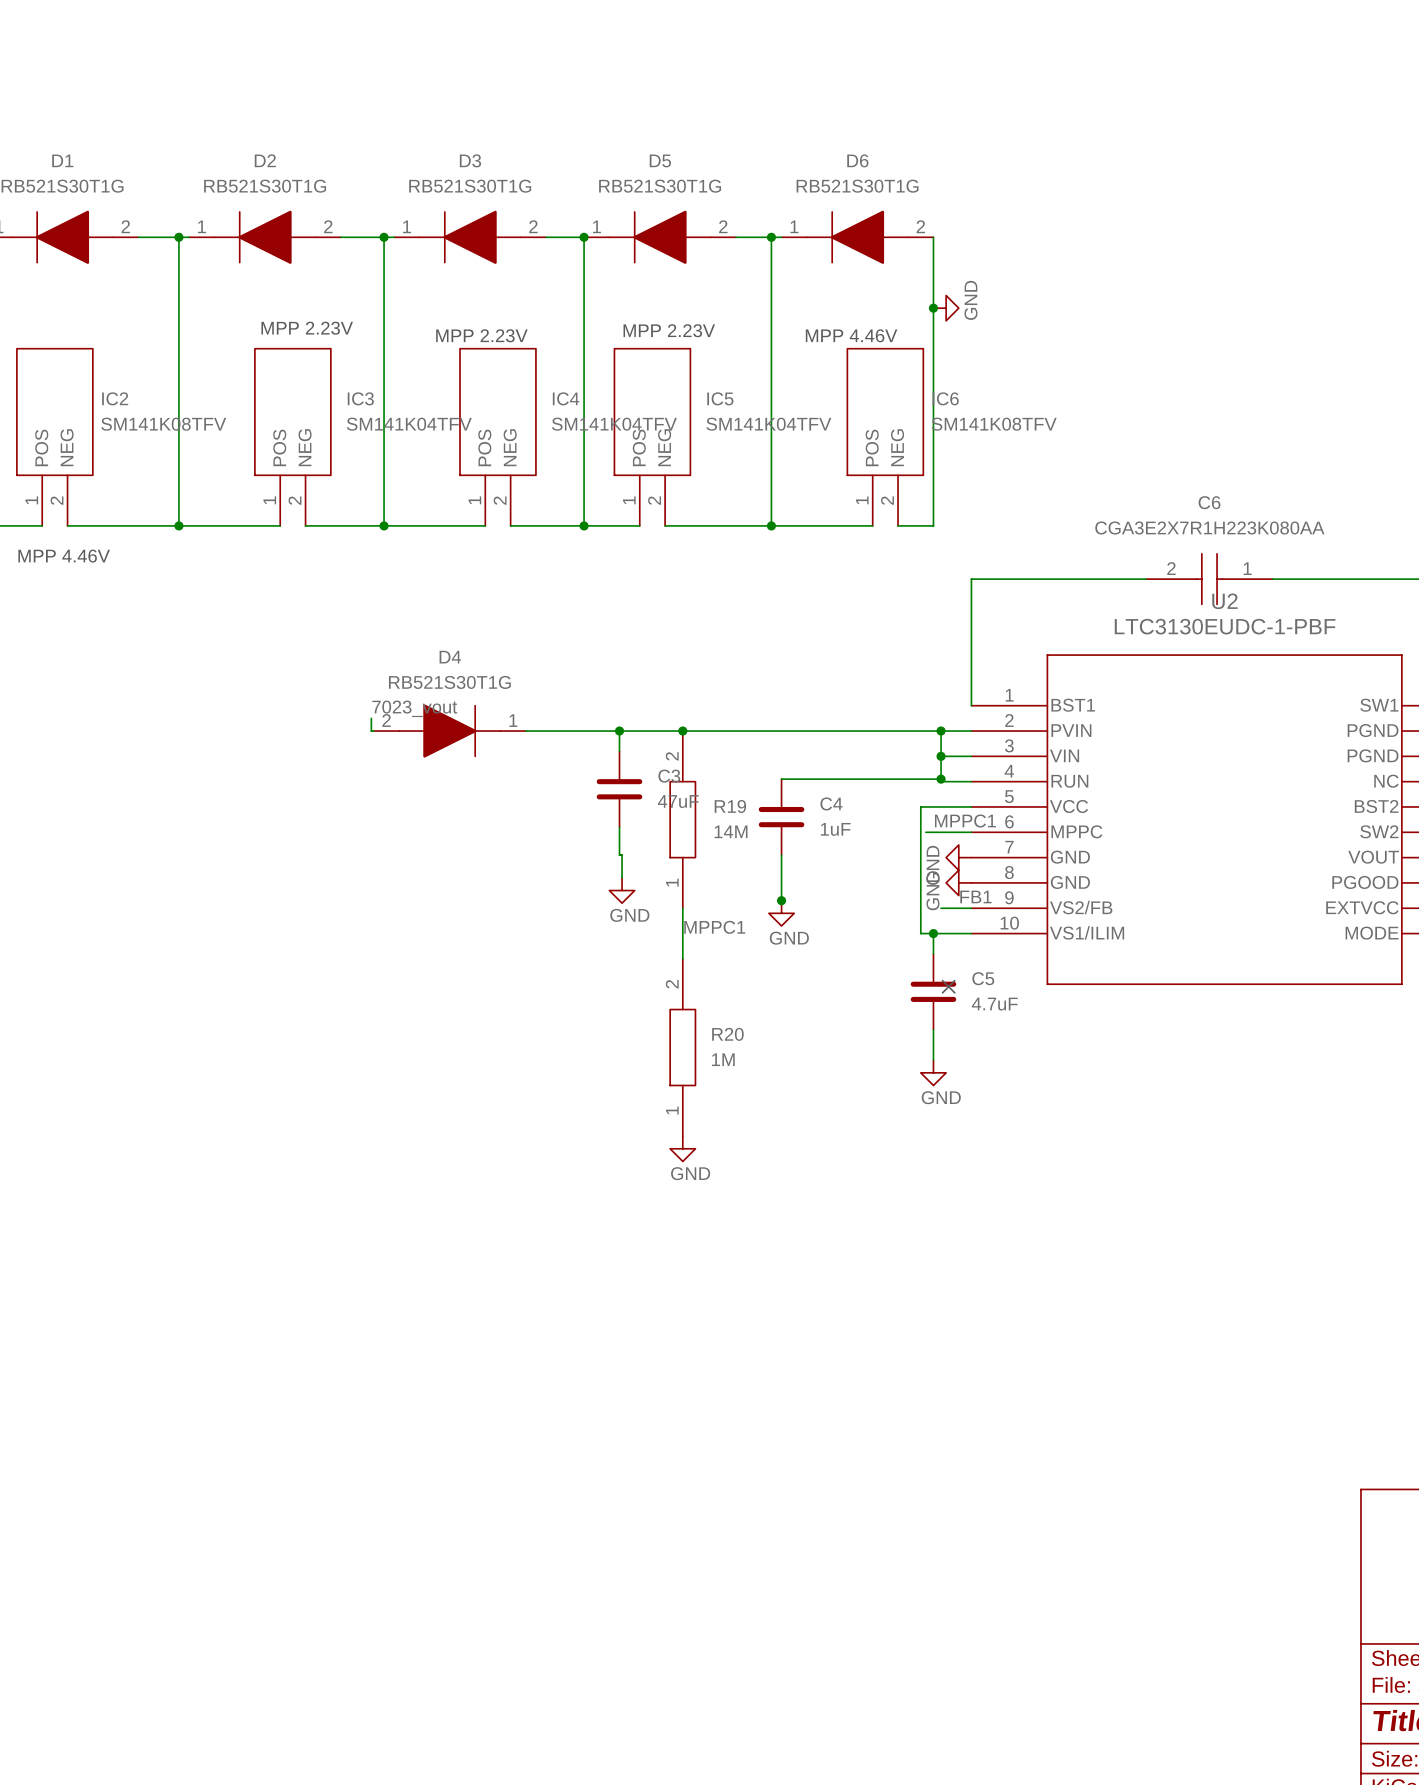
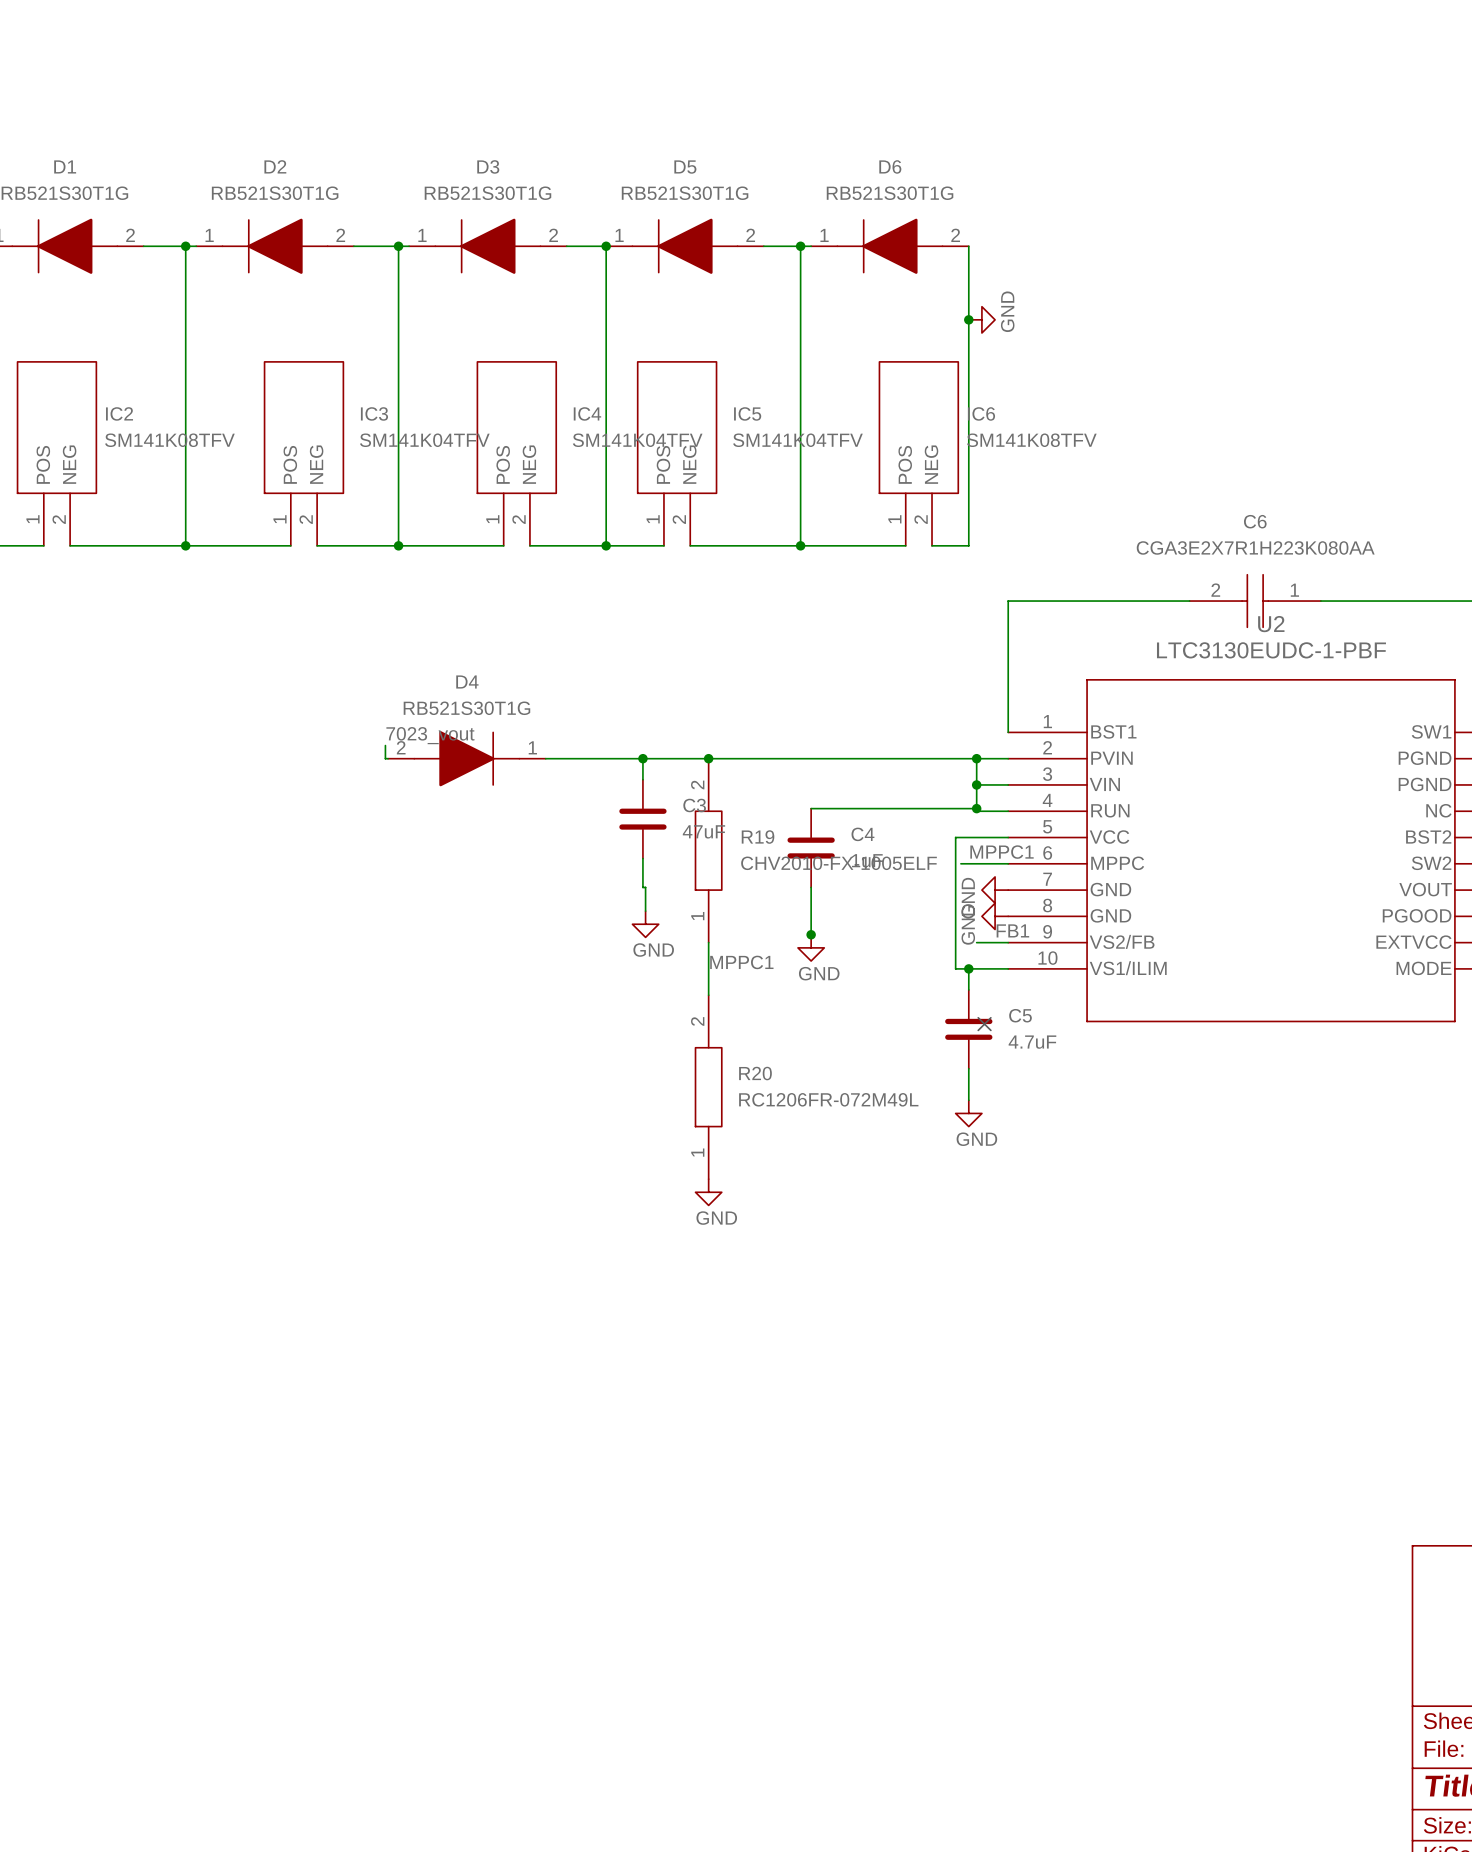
text: MPP 2.23V (307, 328) -> none
text: MPP 2.23V (669, 330) -> none
text: MPP 2.23V (481, 335) -> none
text: MPP 4.46V (851, 335) -> none
text: MPP 4.46V (64, 556) -> none
R19 value: 14M (731, 831) -> CHV2010-FX-1005ELF (839, 863)
R20 value: 1M (723, 1059) -> RC1206FR-072M49L (828, 1099)

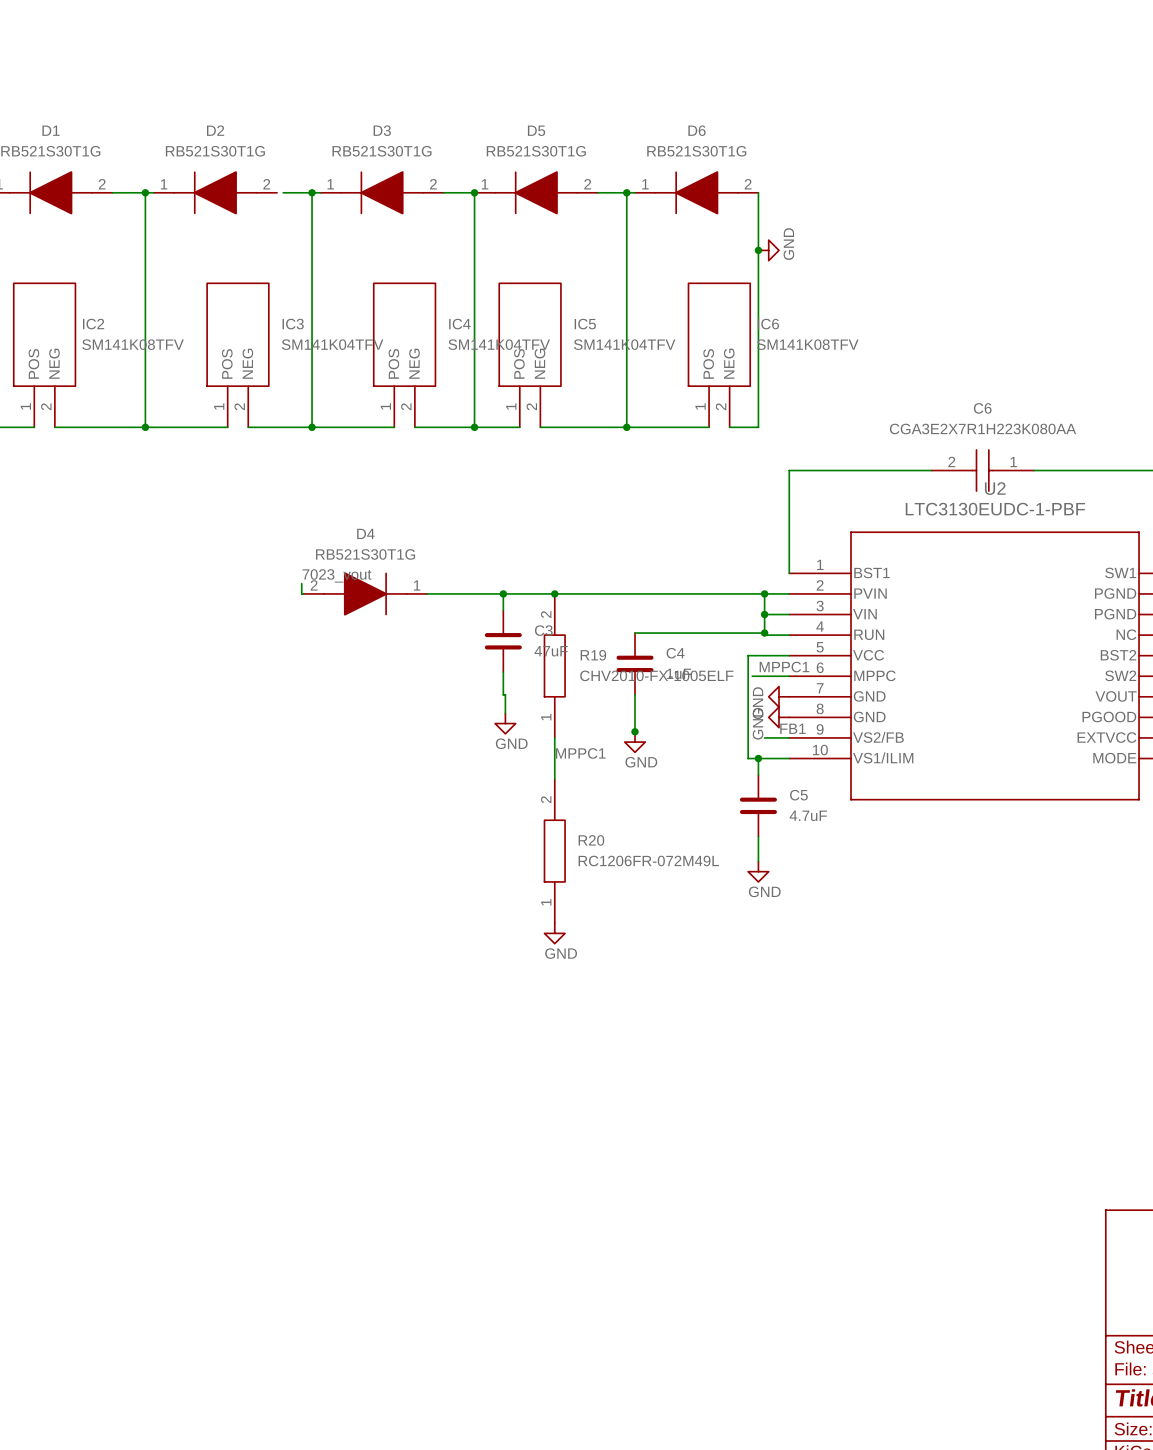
wire: (353, 246) (361, 246) -> none
no-connect mark: (984, 1024) -> none

